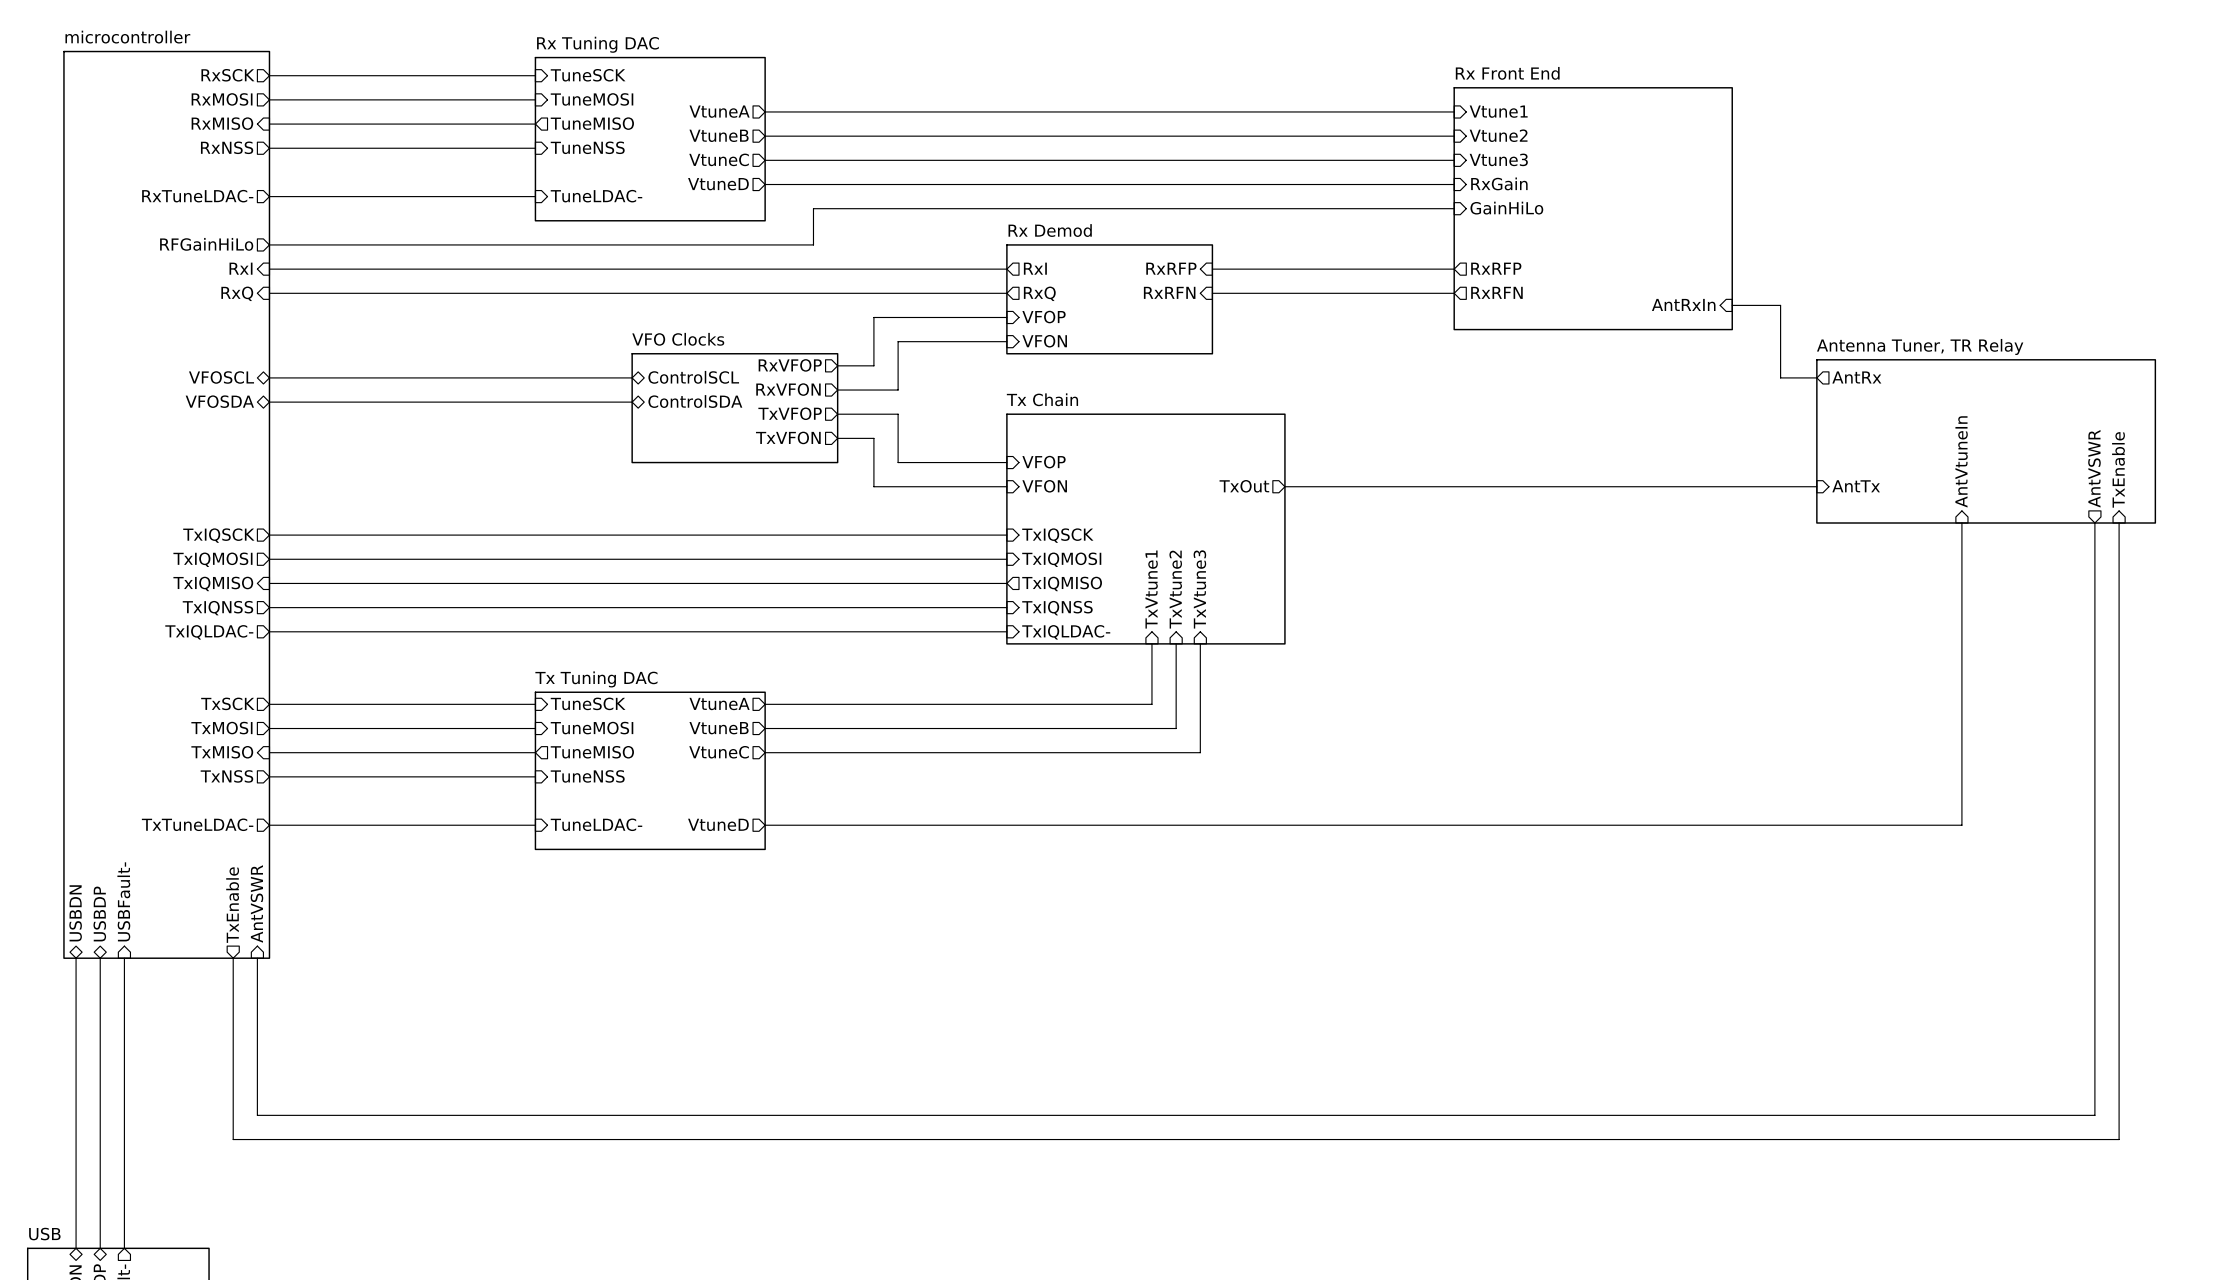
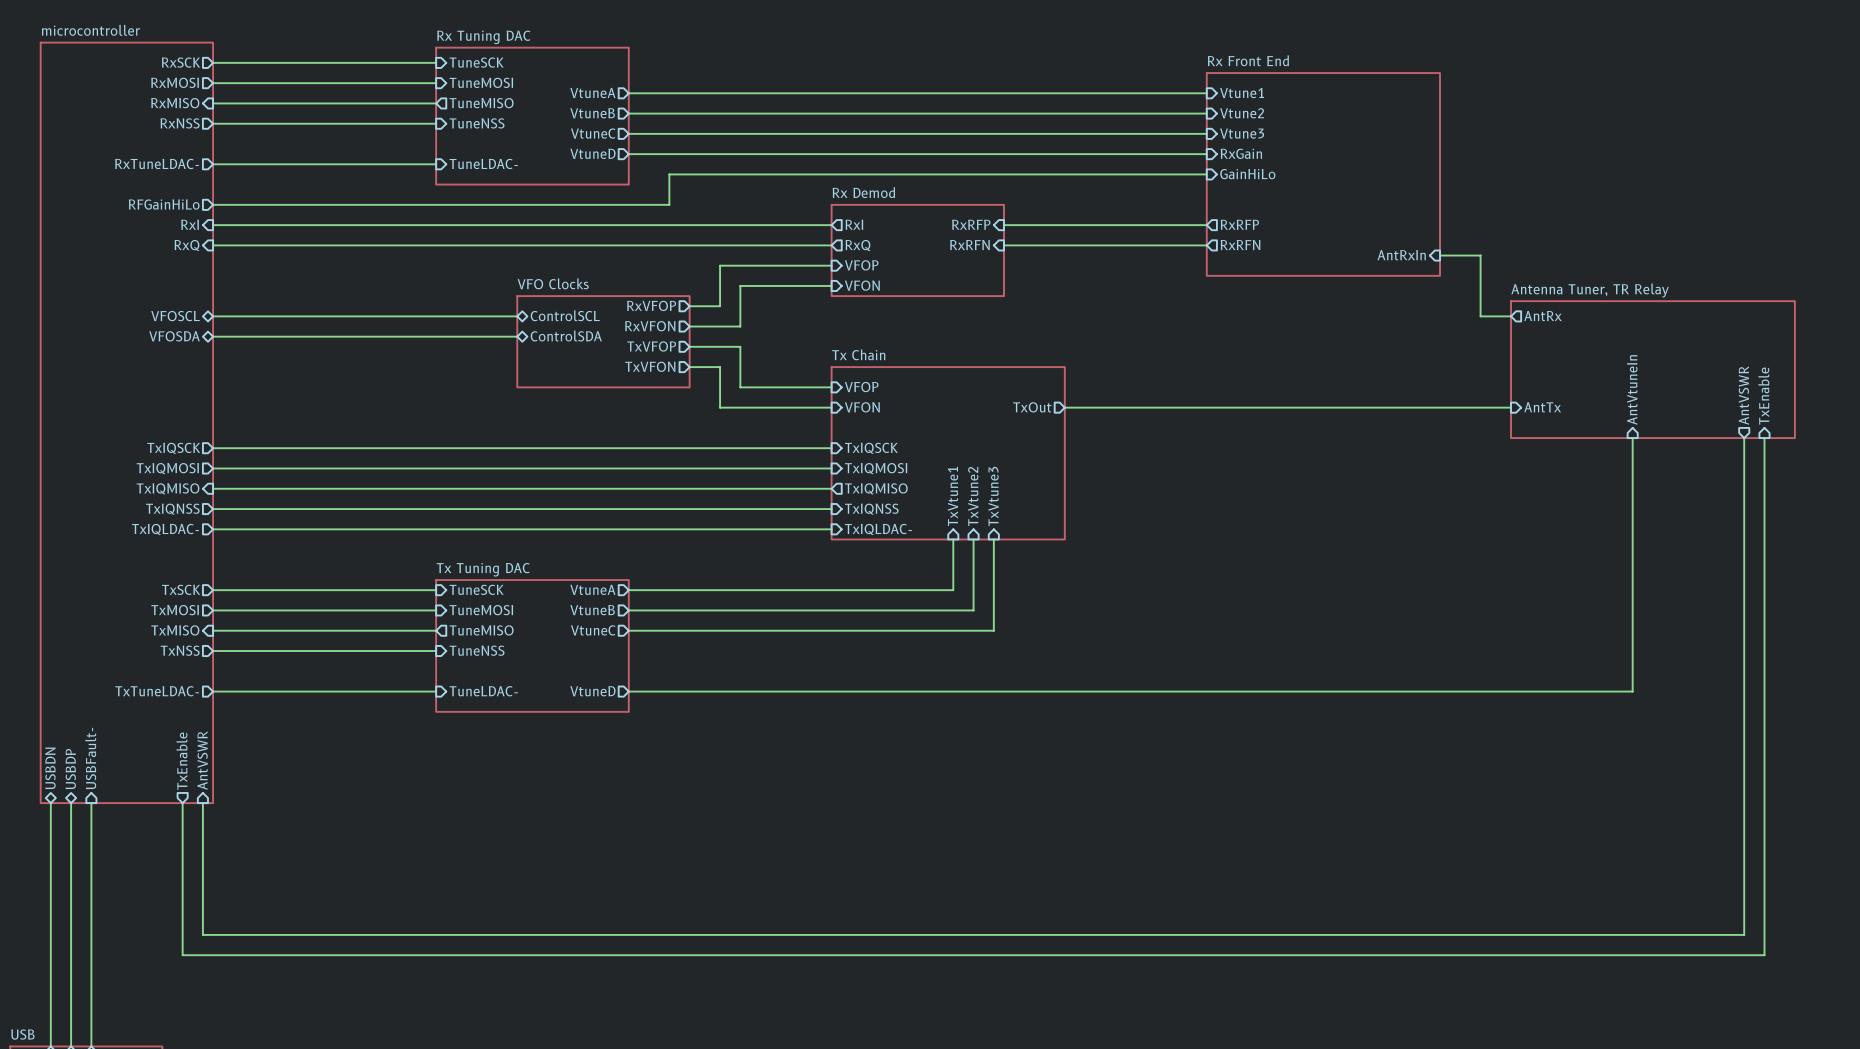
sheet Tx Chain: (1145, 529) -> none
sheet Tx Chain: none -> (948, 453)

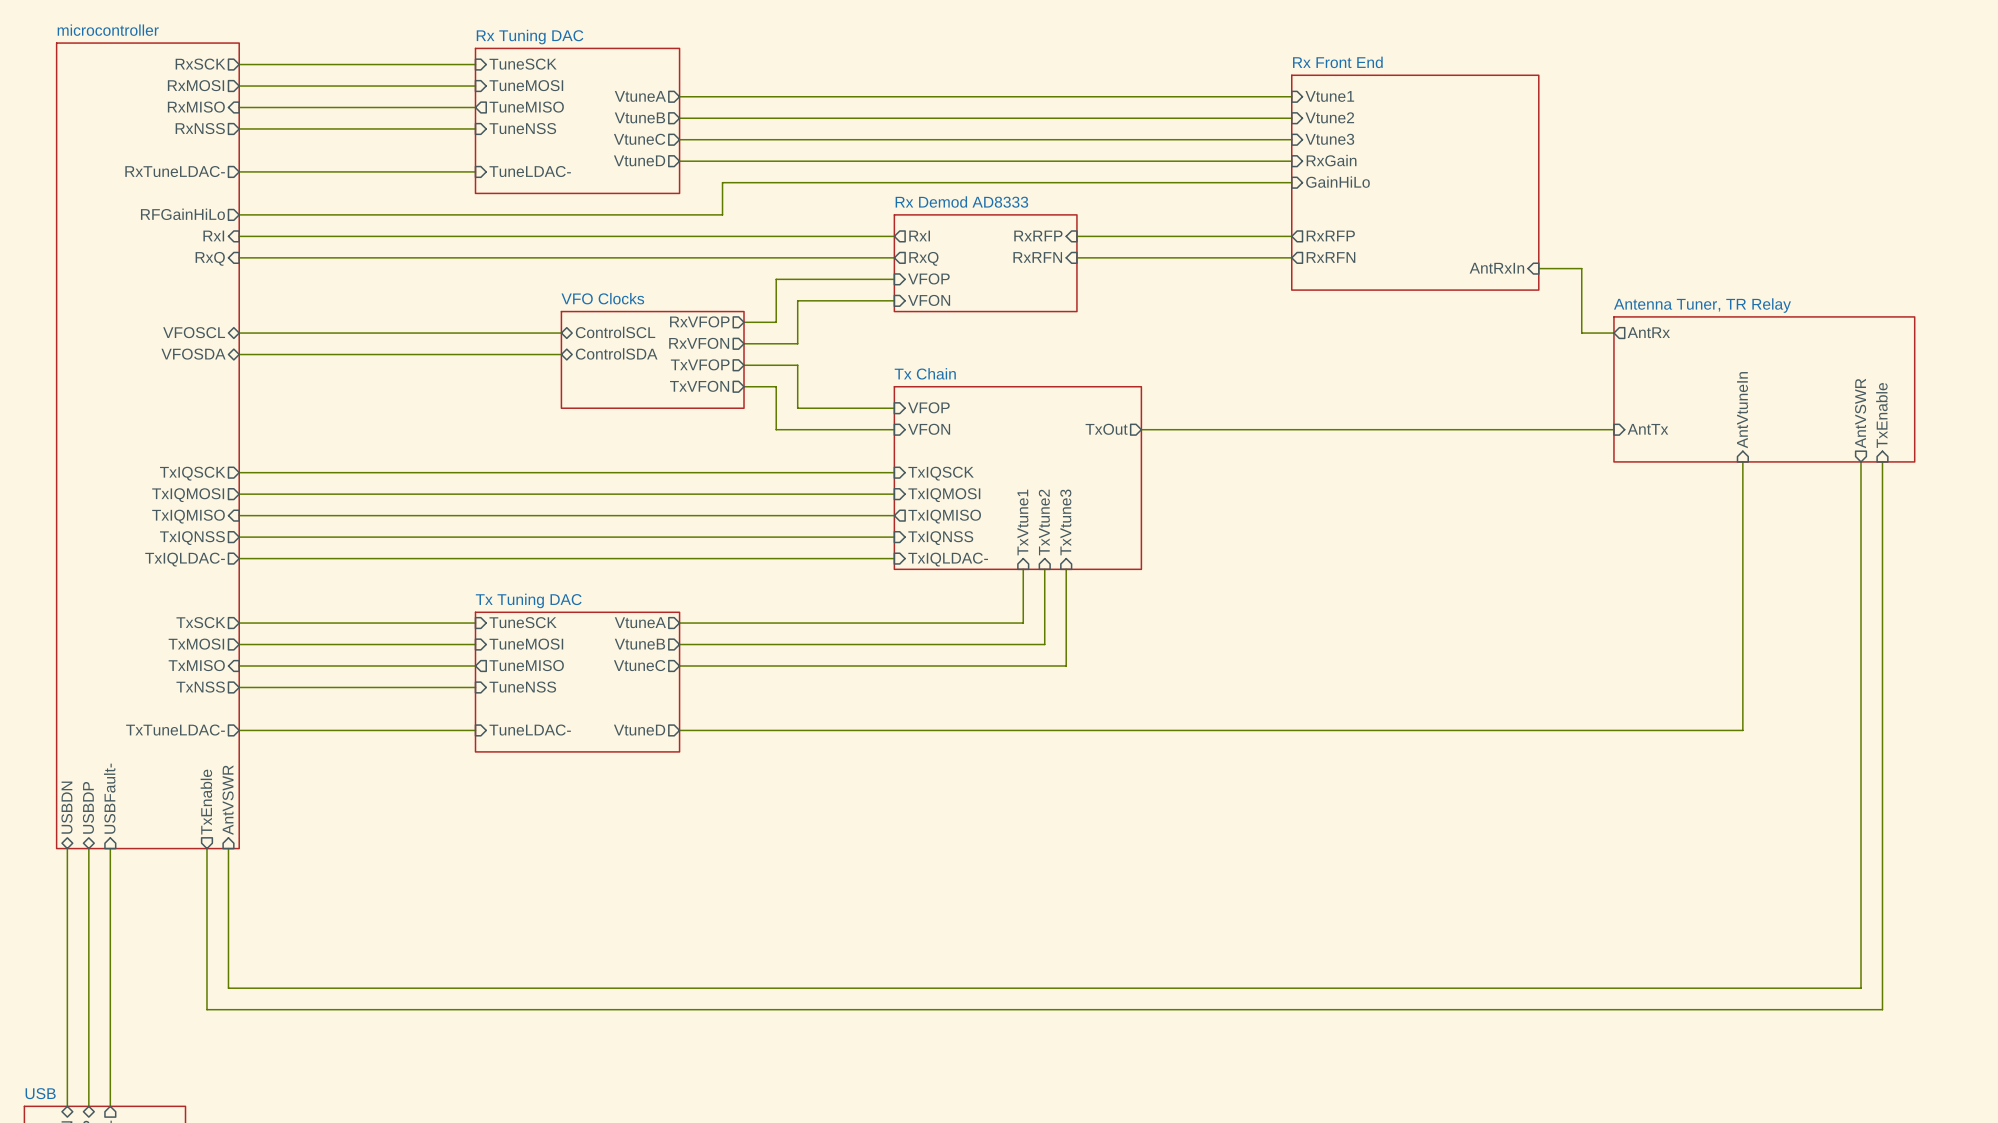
sheet Rx Demod name: Rx Demod (863, 192) -> Rx Demod AD8333 (961, 201)

